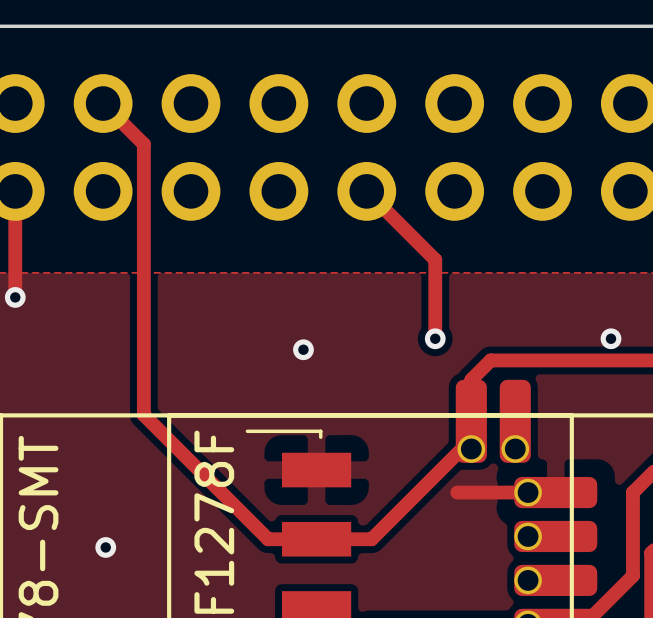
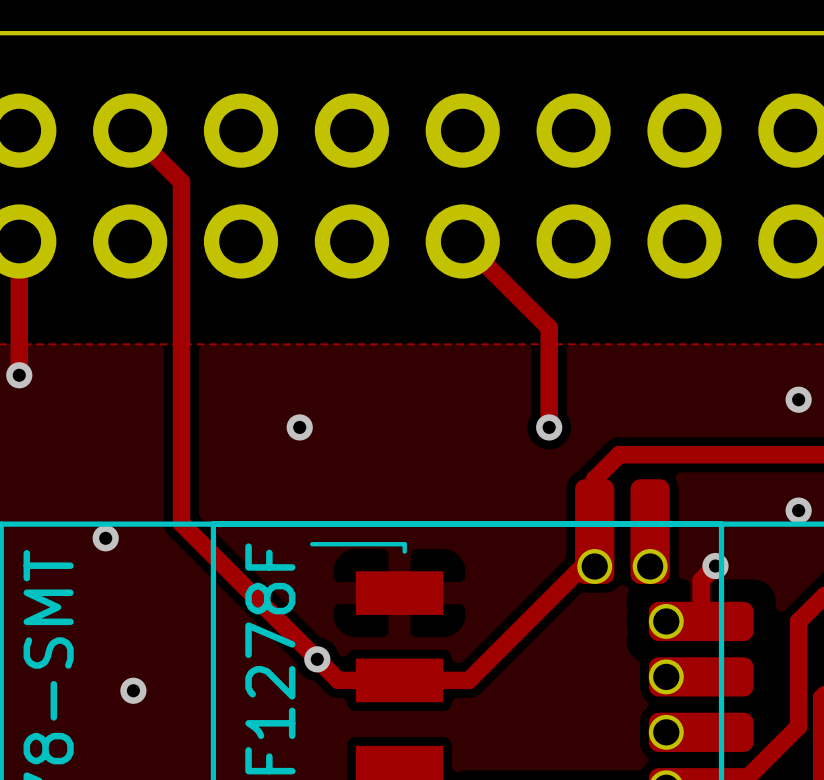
via position: (611, 338) -> (798, 399)
via position: (303, 349) -> (299, 427)
via: none -> (798, 510)
via: none -> (105, 538)
track: none -> (715, 566) (701, 580) (701, 621)
via: none -> (715, 566)
track: (457, 492) (535, 492) -> none
via: none -> (317, 659)

